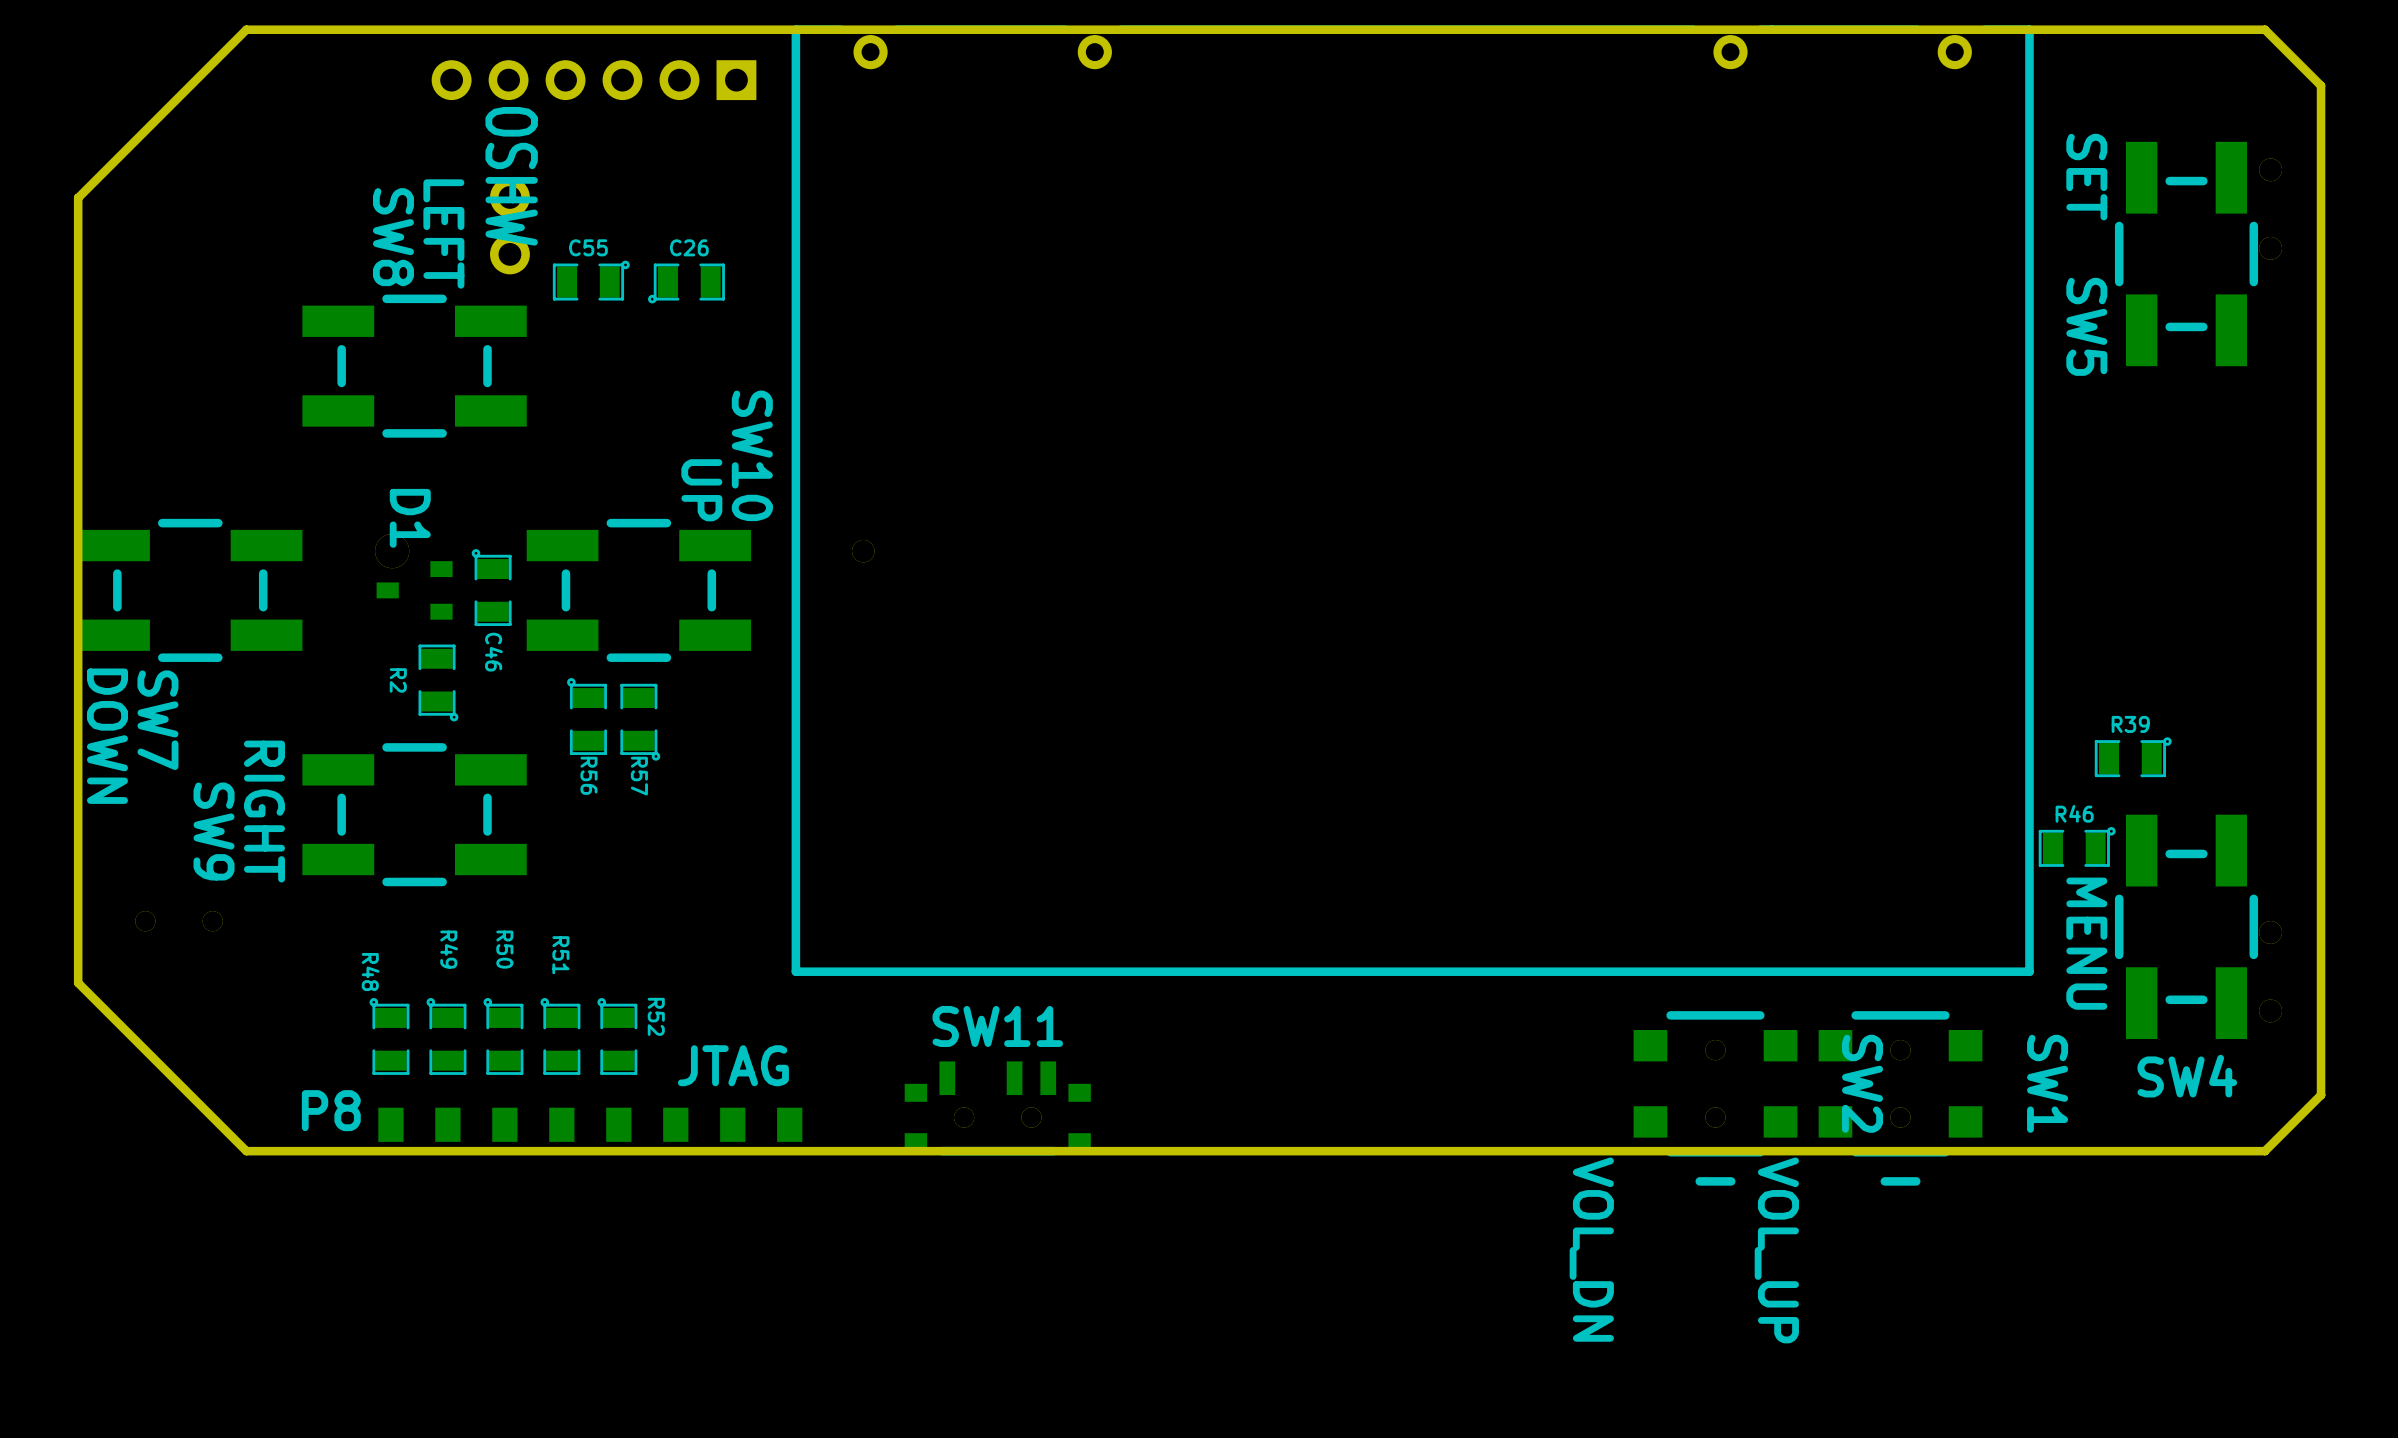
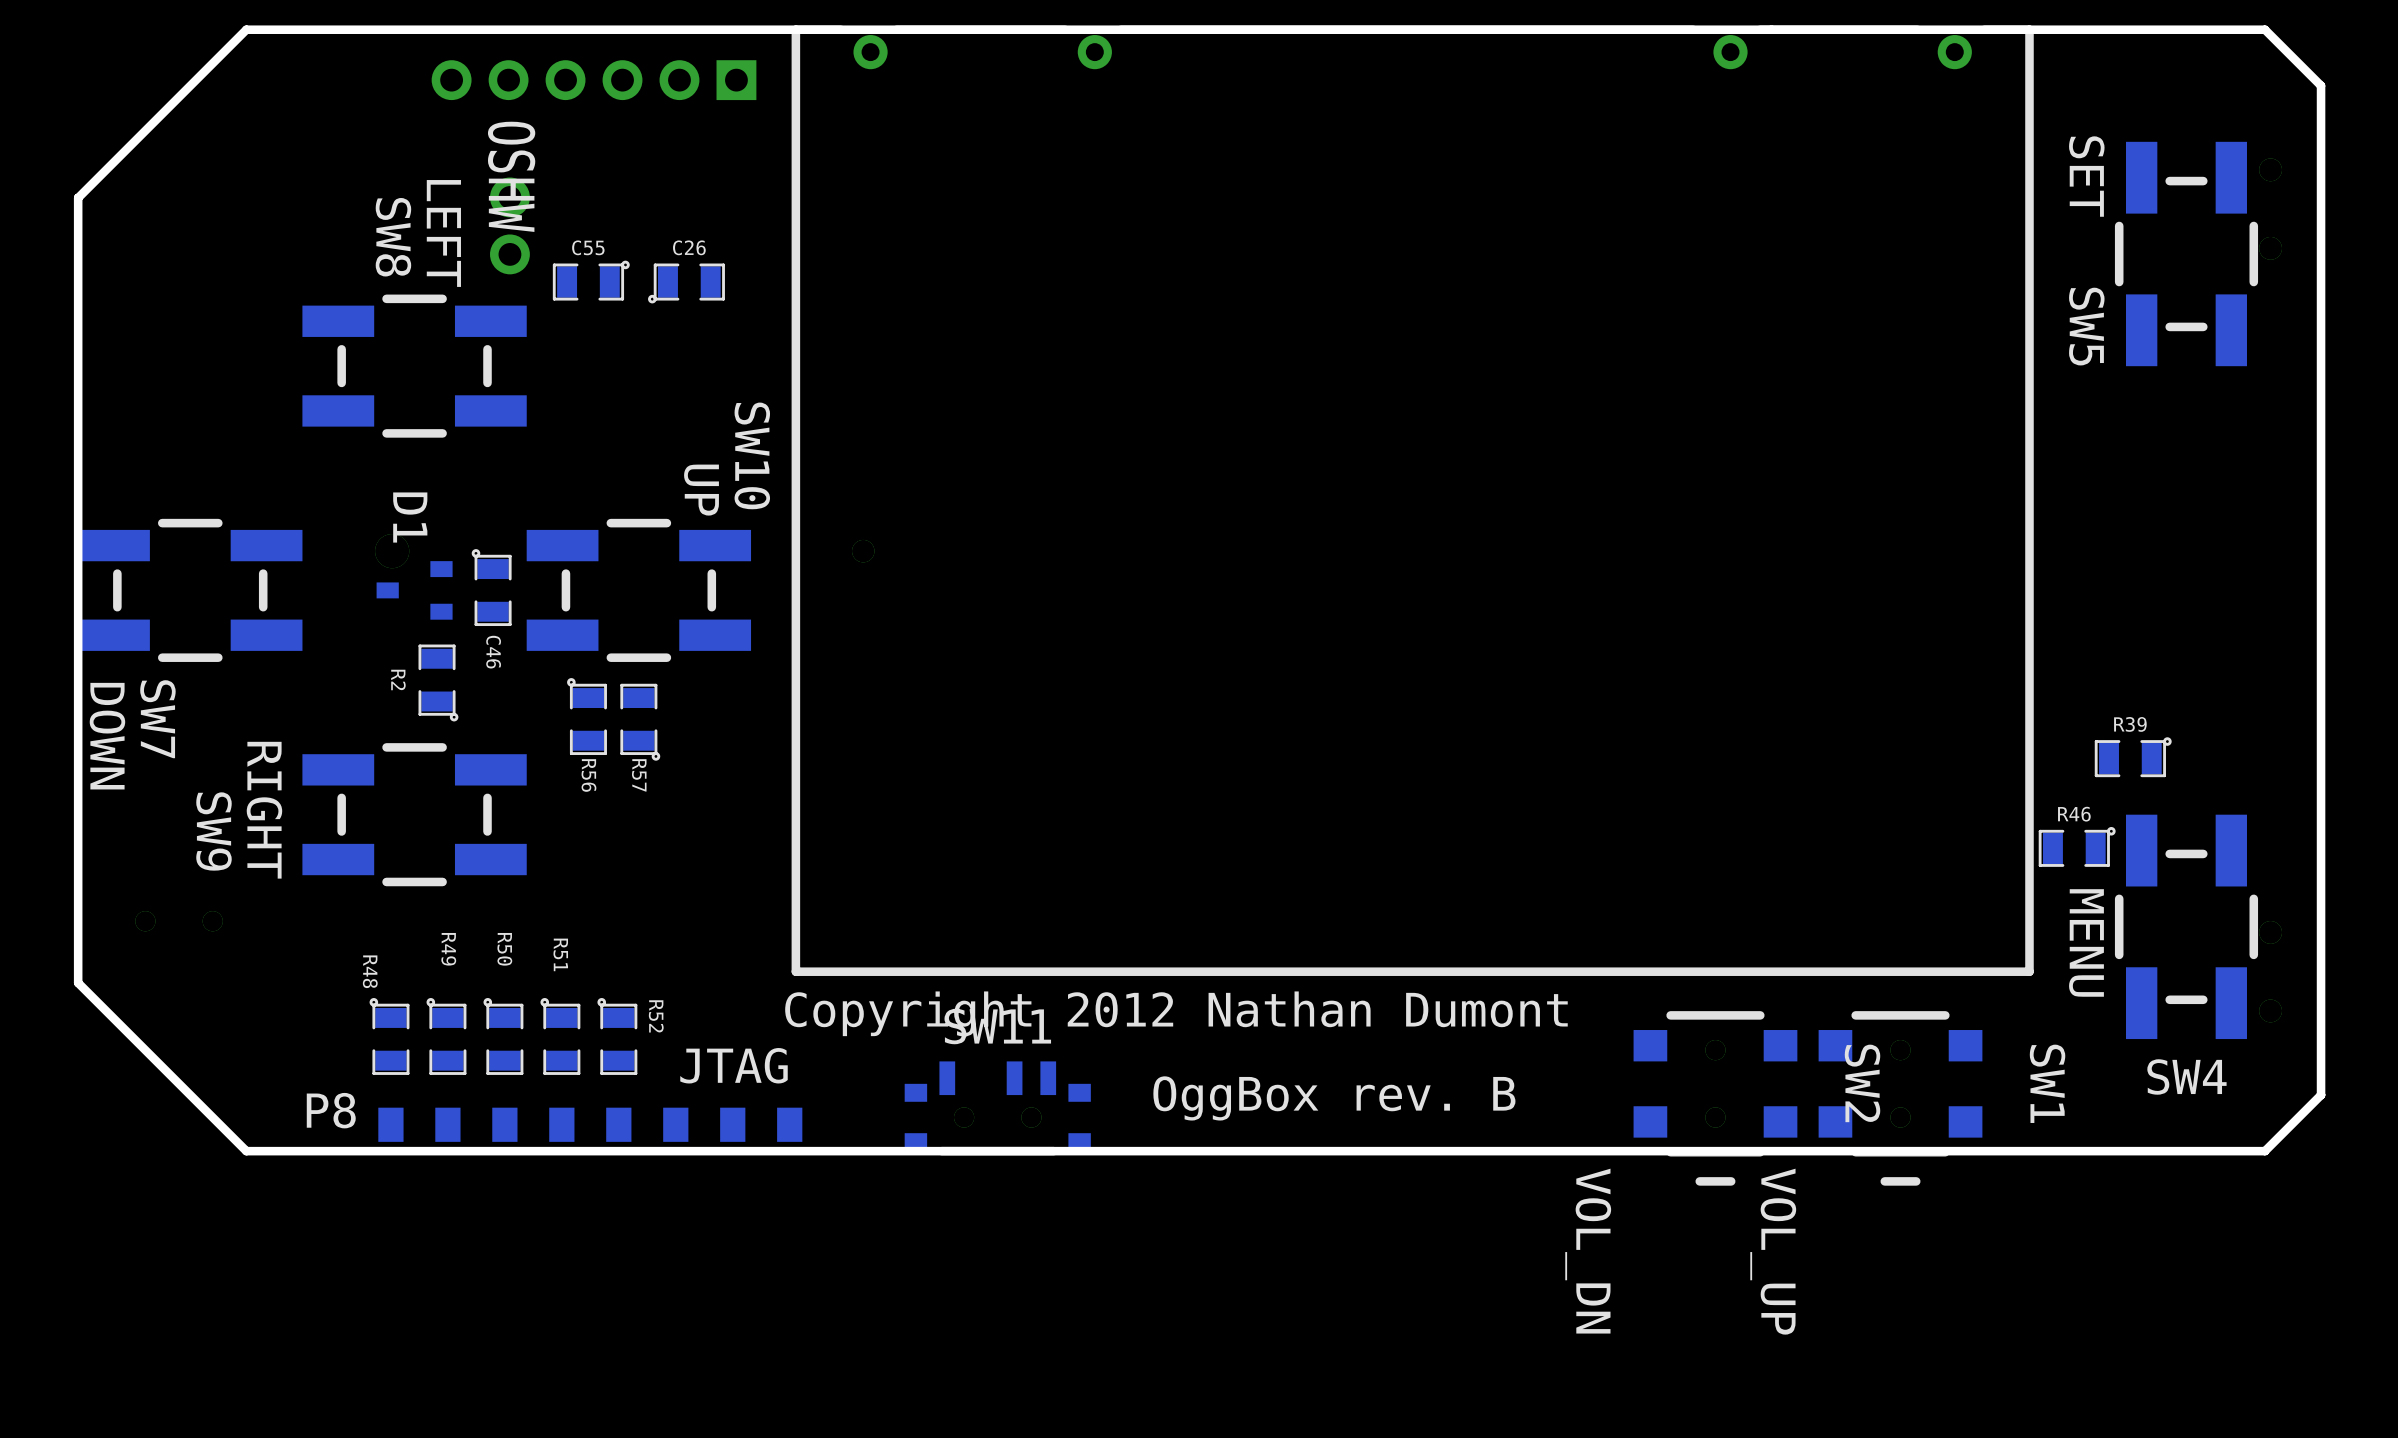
text: none -> Copyright 2012 Nathan Dumont (1176, 1013)
text: none -> OggBox rev. B (1334, 1098)

